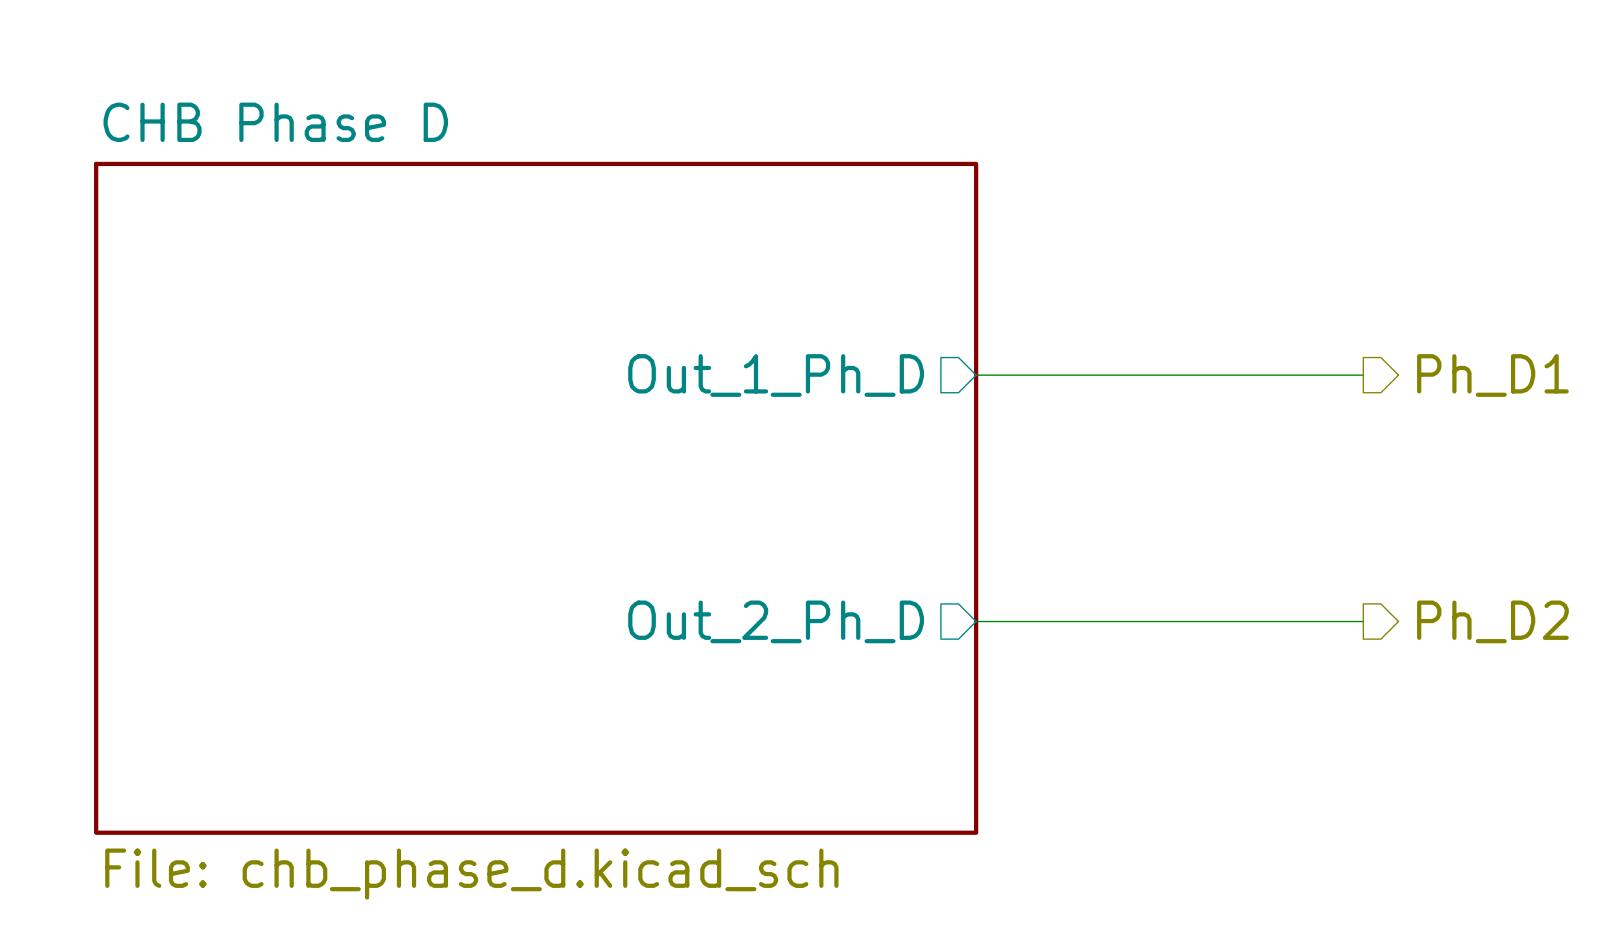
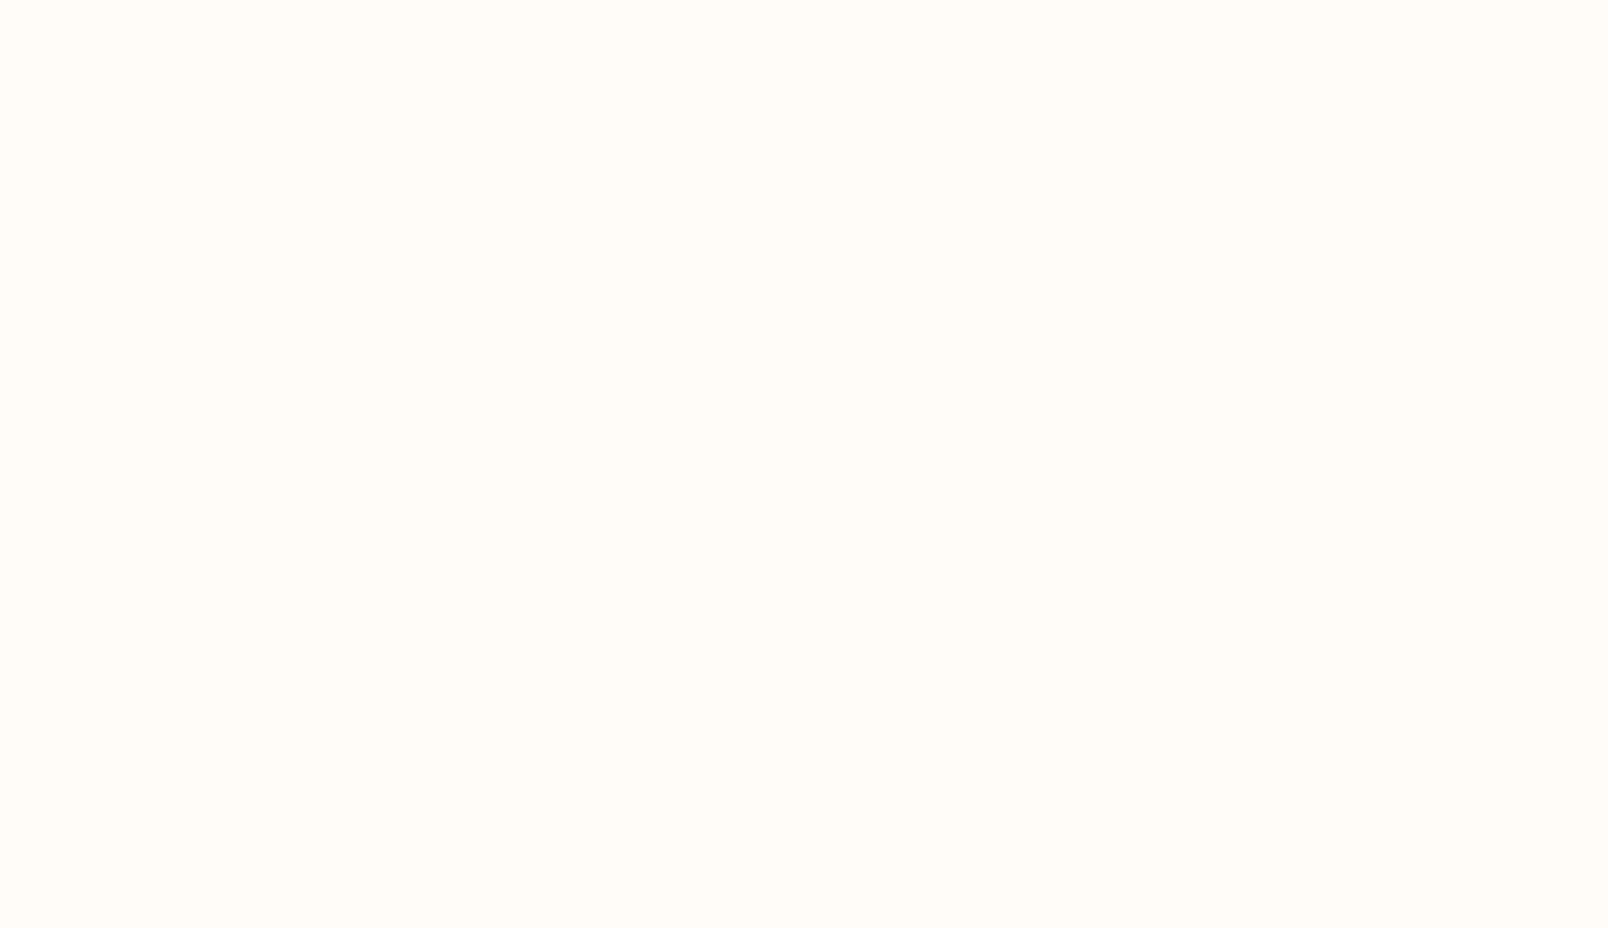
sheet pin: Out_1_Ph_D (776, 375) -> none
wire: (976, 375) (1363, 375) -> none
hierarchical label: Ph_D1 (1492, 375) -> none
sheet CHB Phase D: File: chb_phase_d.kicad_sch (536, 498) -> none
sheet pin: Out_2_Ph_D (776, 621) -> none
wire: (976, 621) (1363, 621) -> none
hierarchical label: Ph_D2 (1492, 621) -> none

